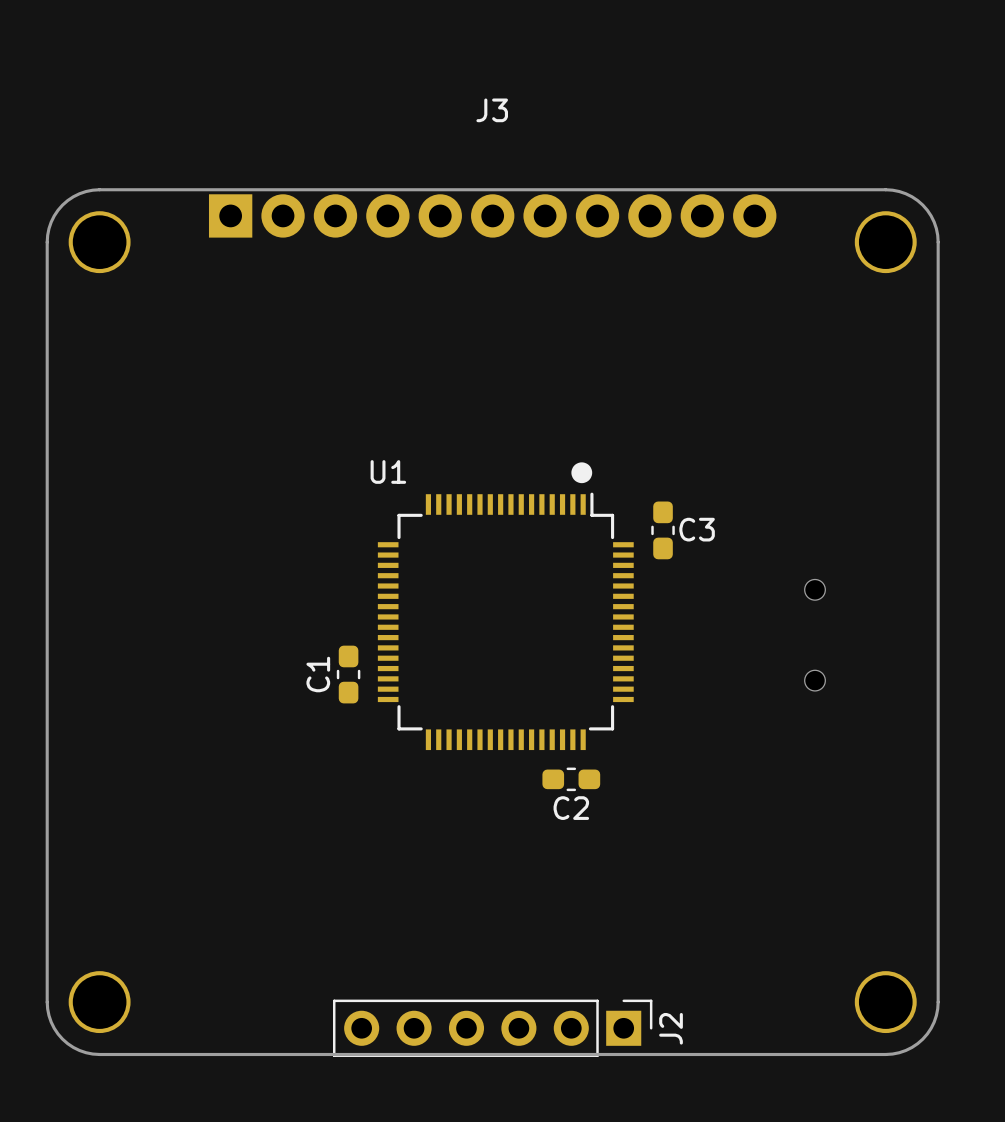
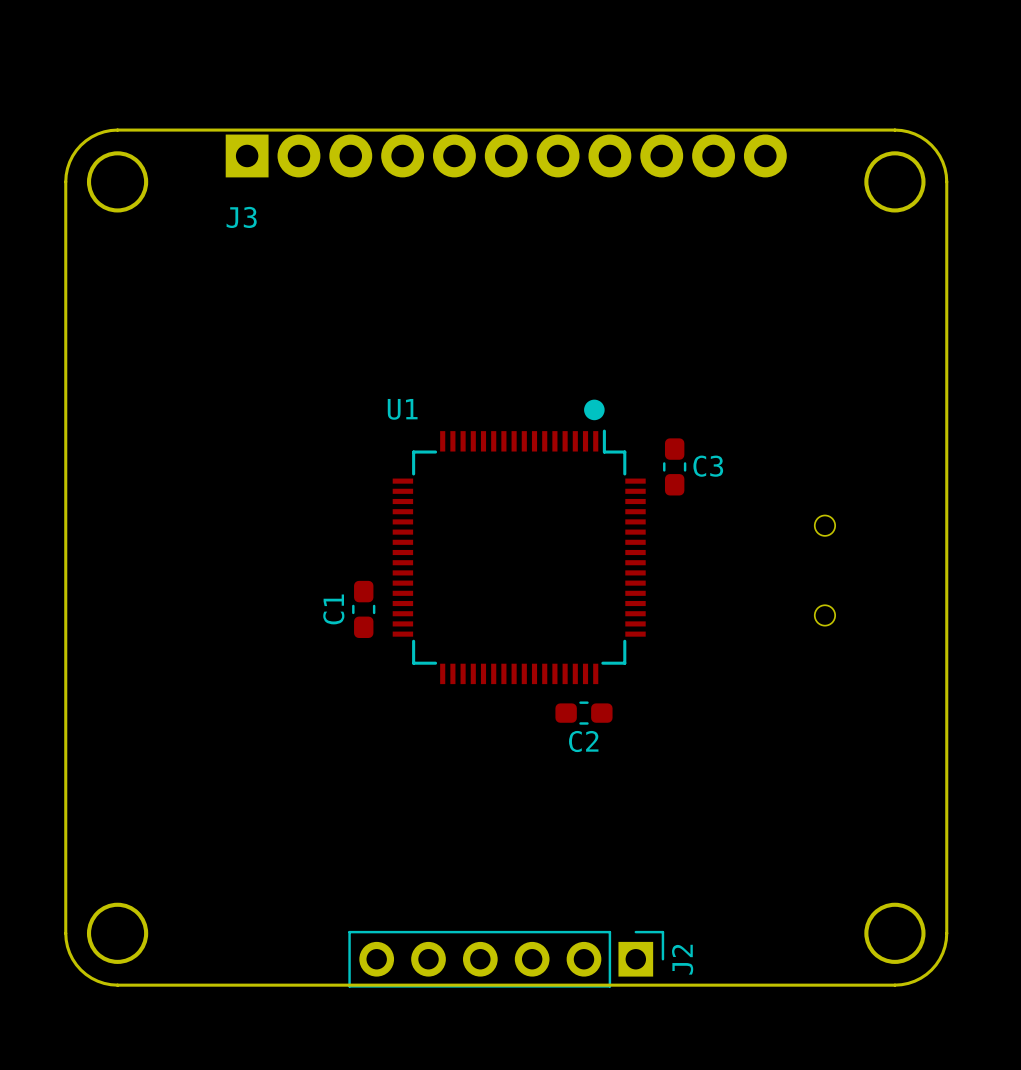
J3 name position: J3 (492, 110) -> J3 (241, 217)

